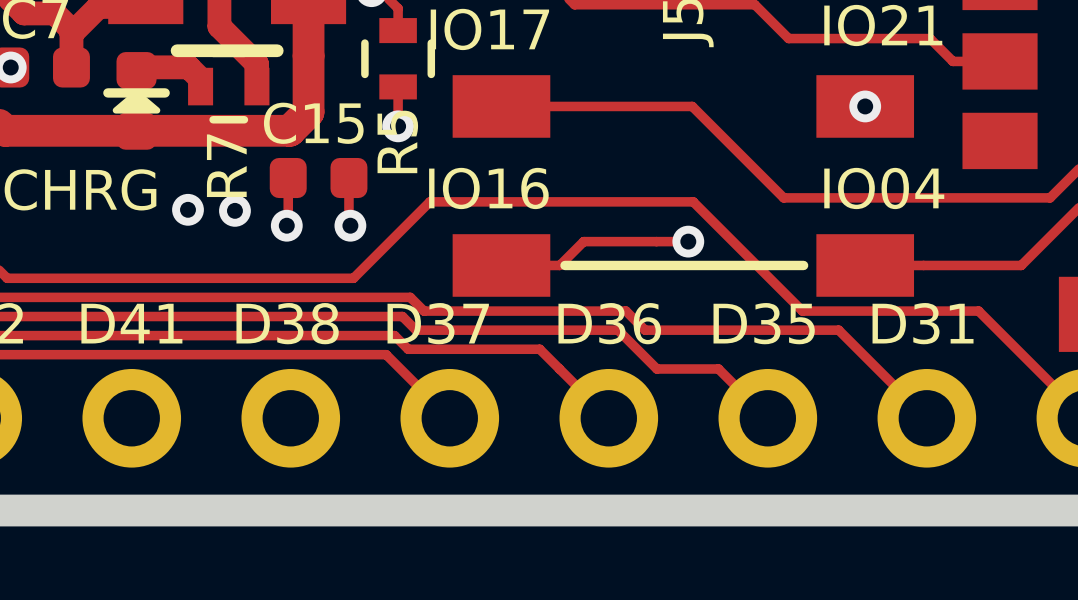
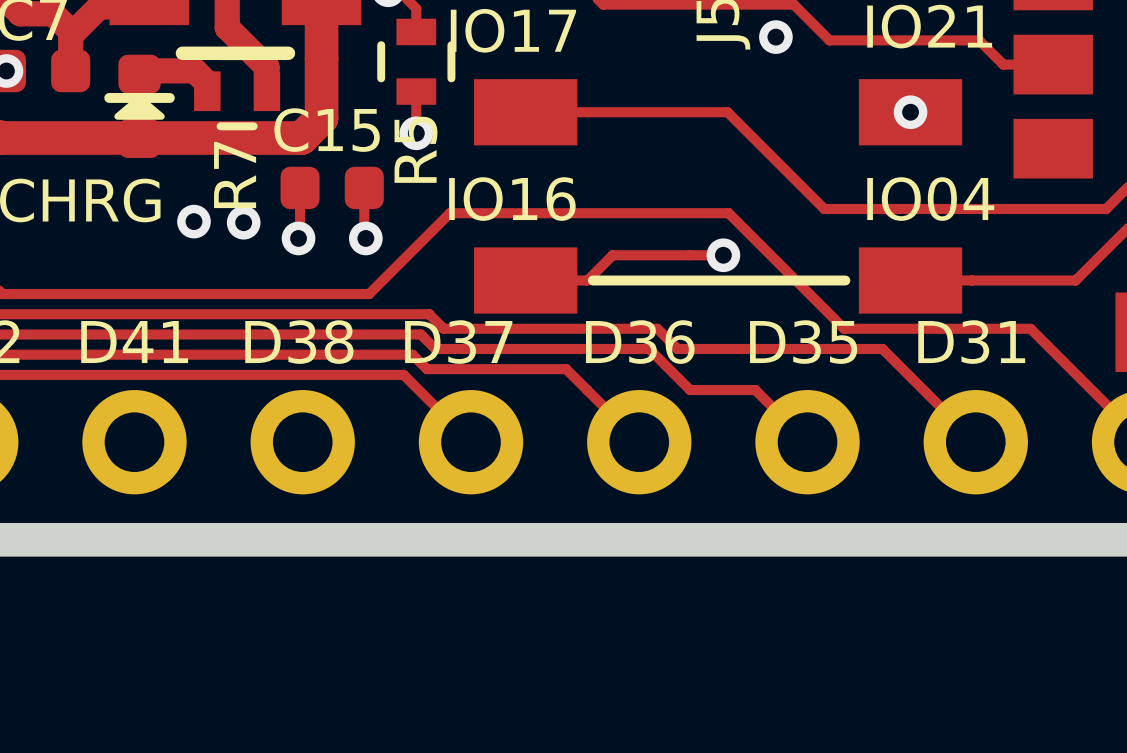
via: none -> (775, 37)

